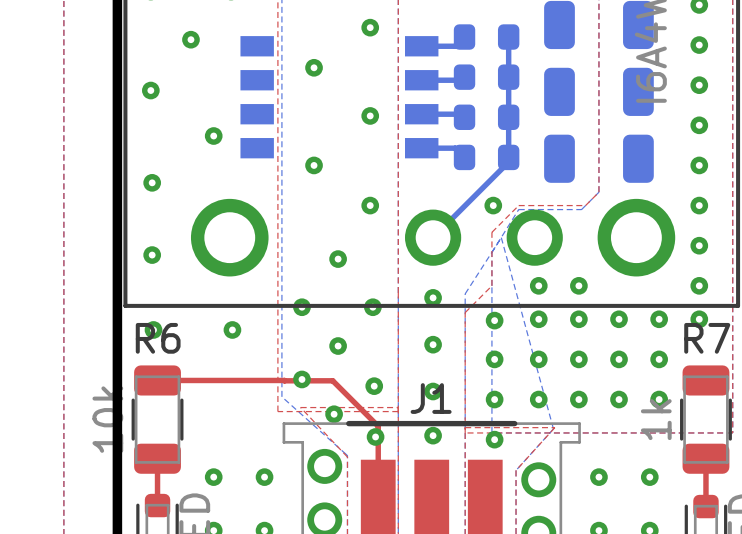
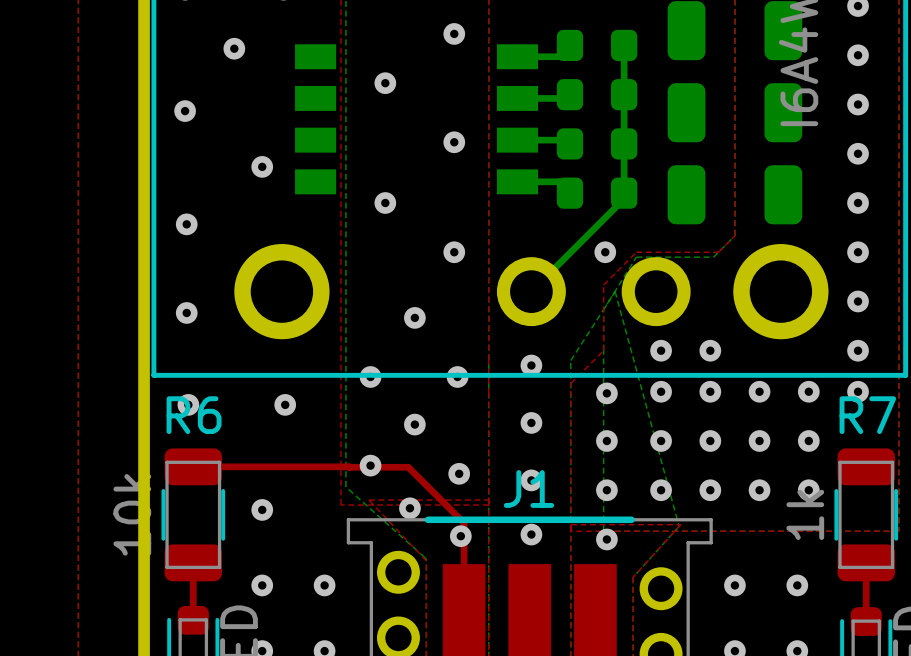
via: none -> (262, 509)

